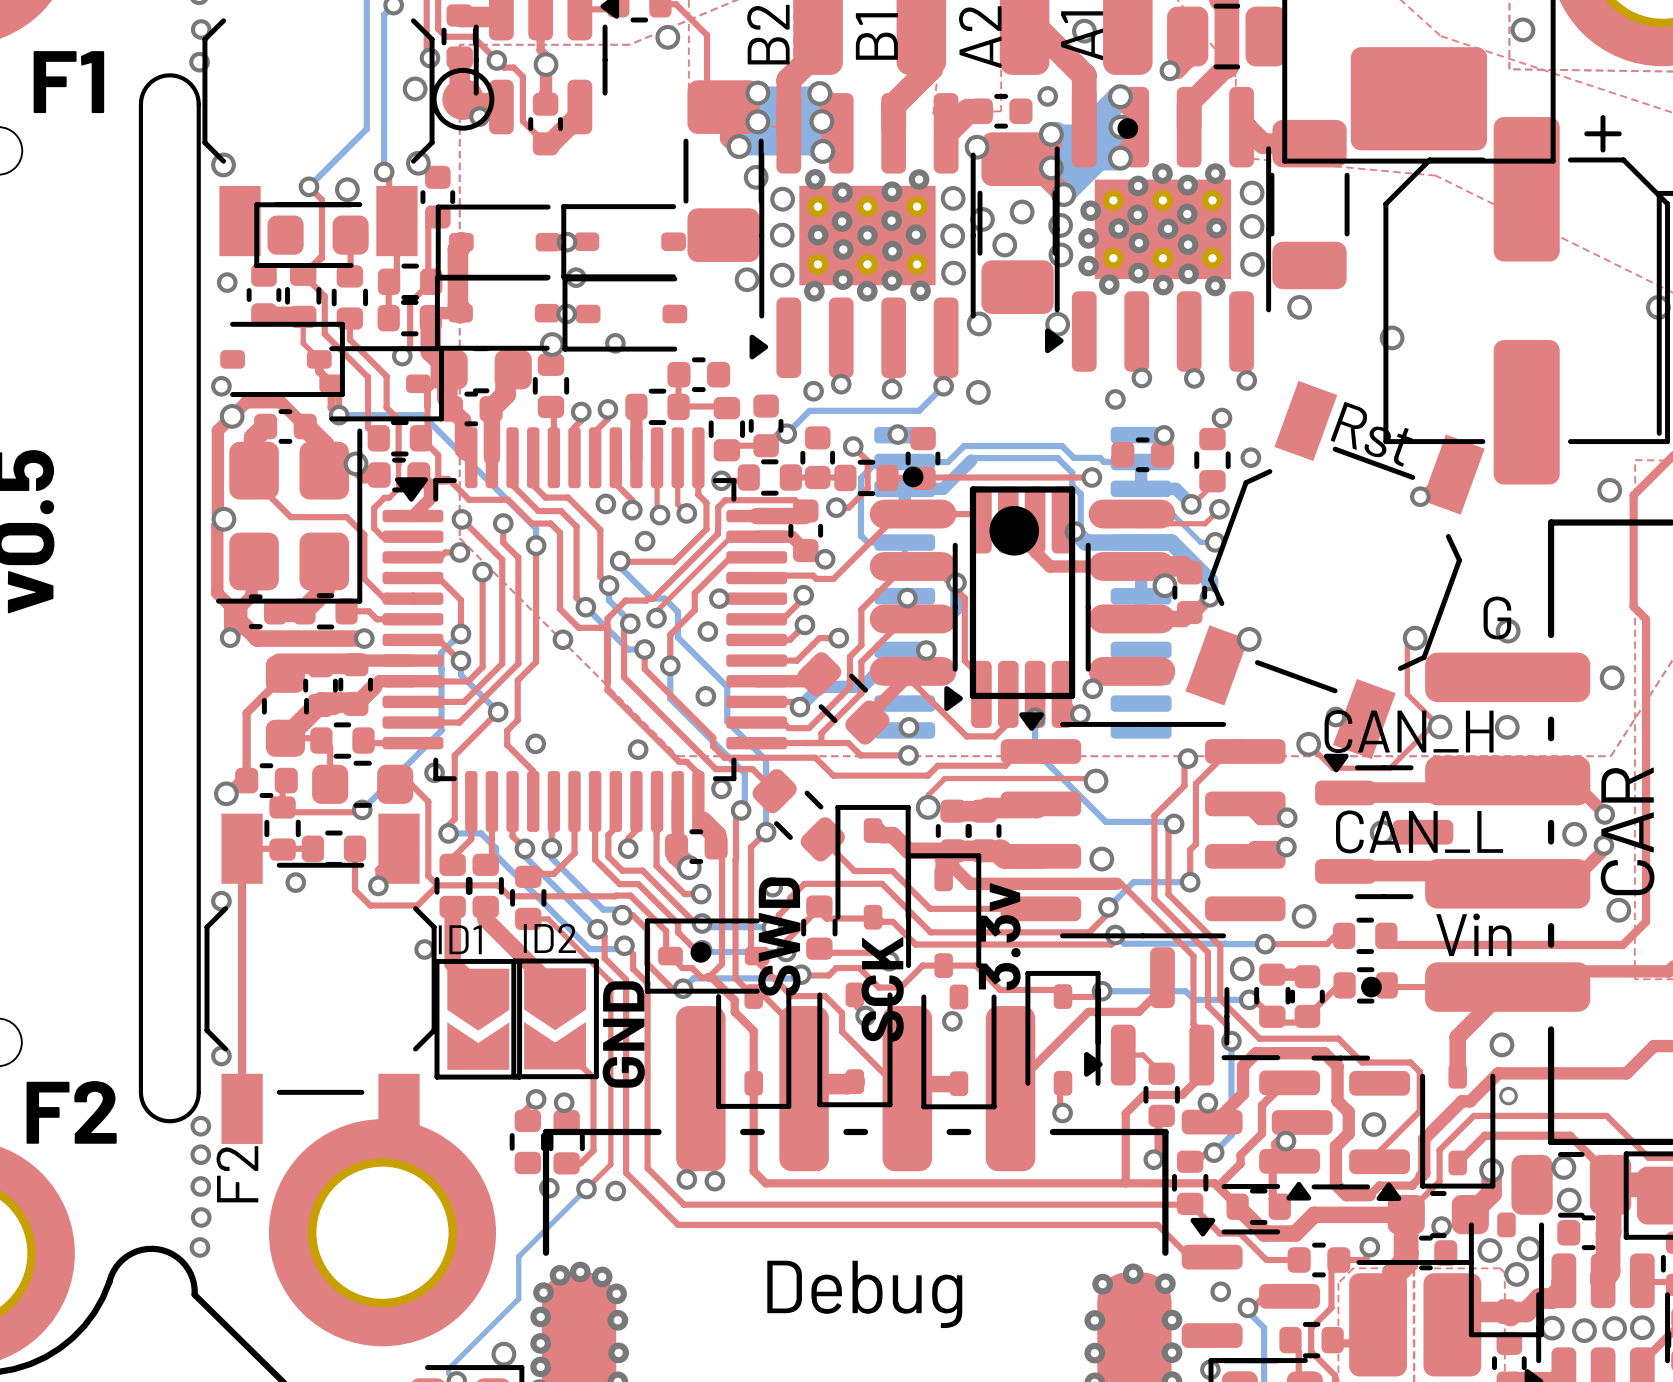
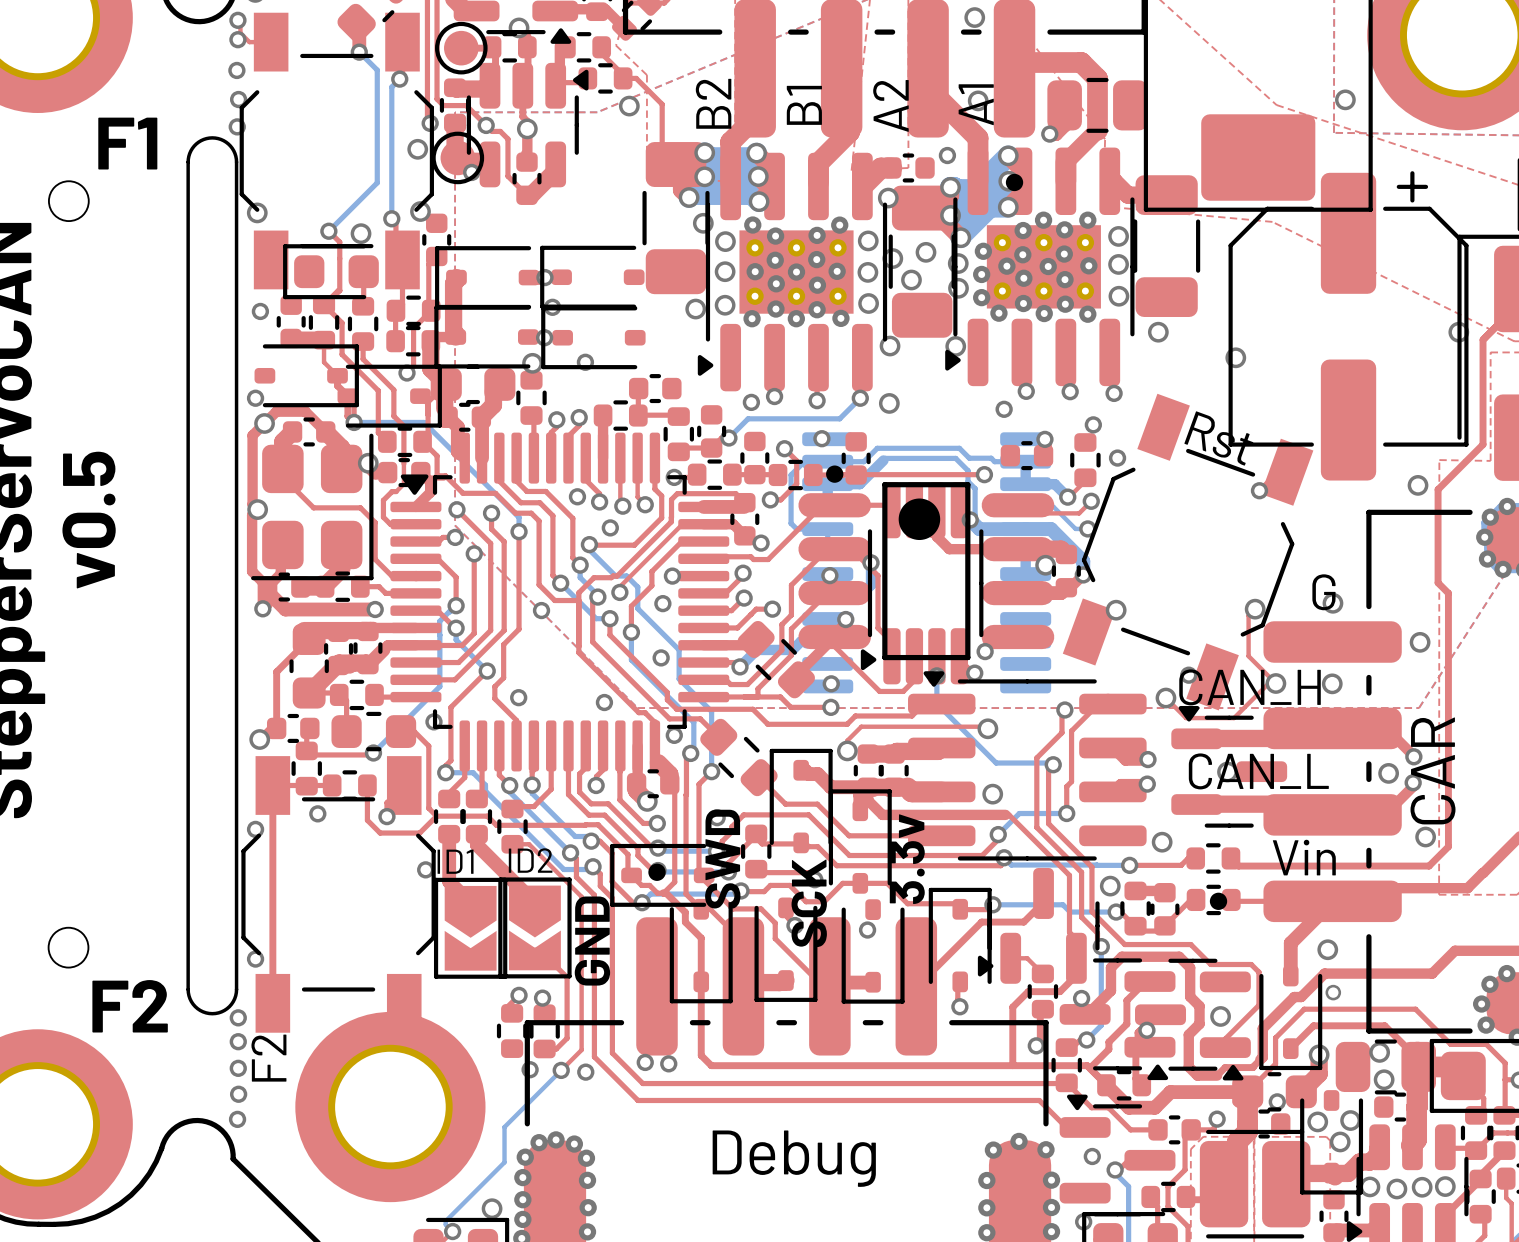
part position: (923, 458) -> (856, 458)

